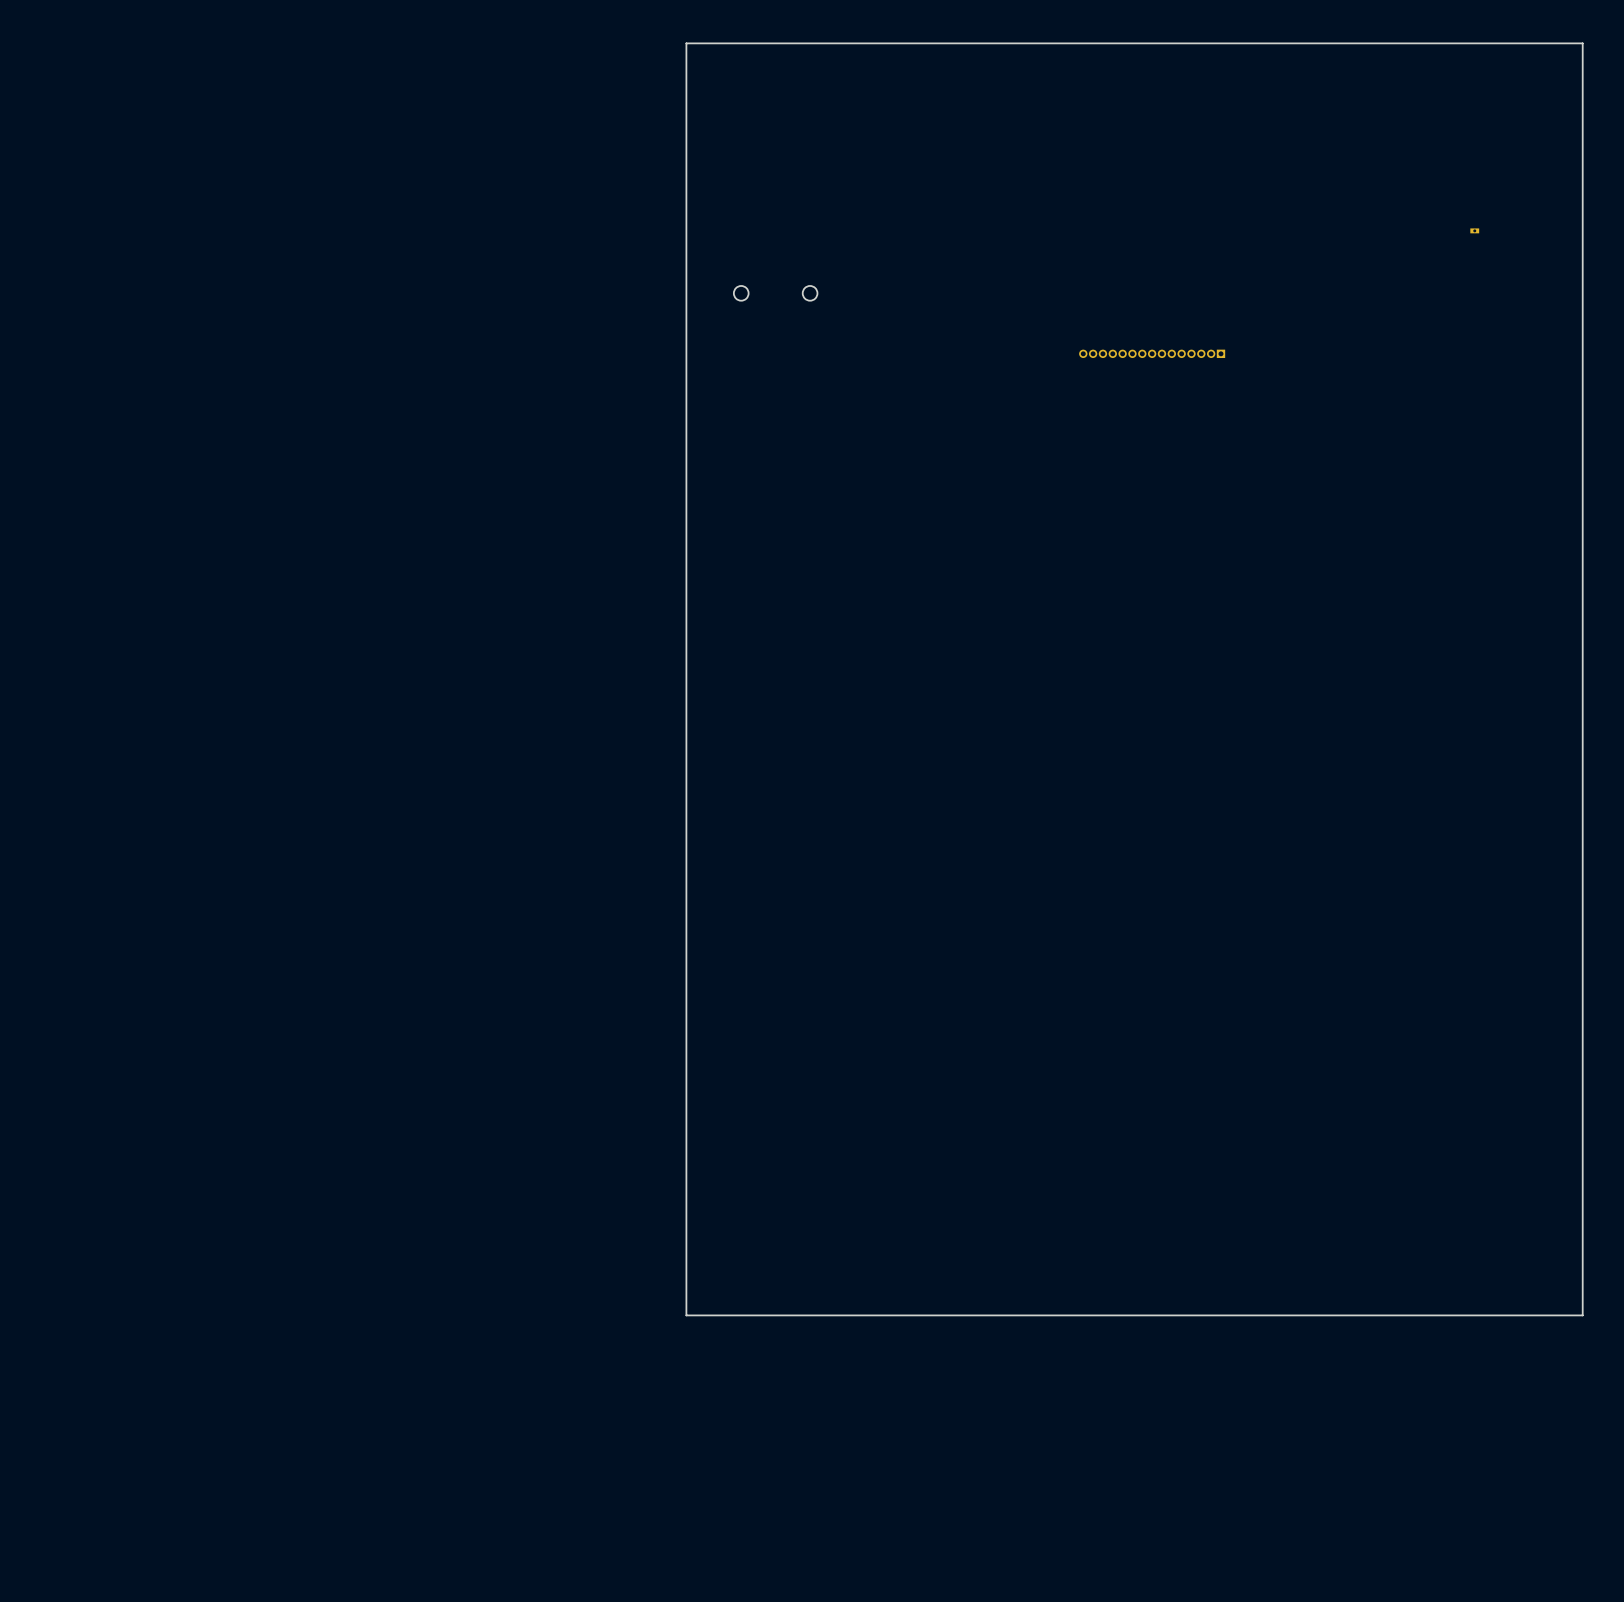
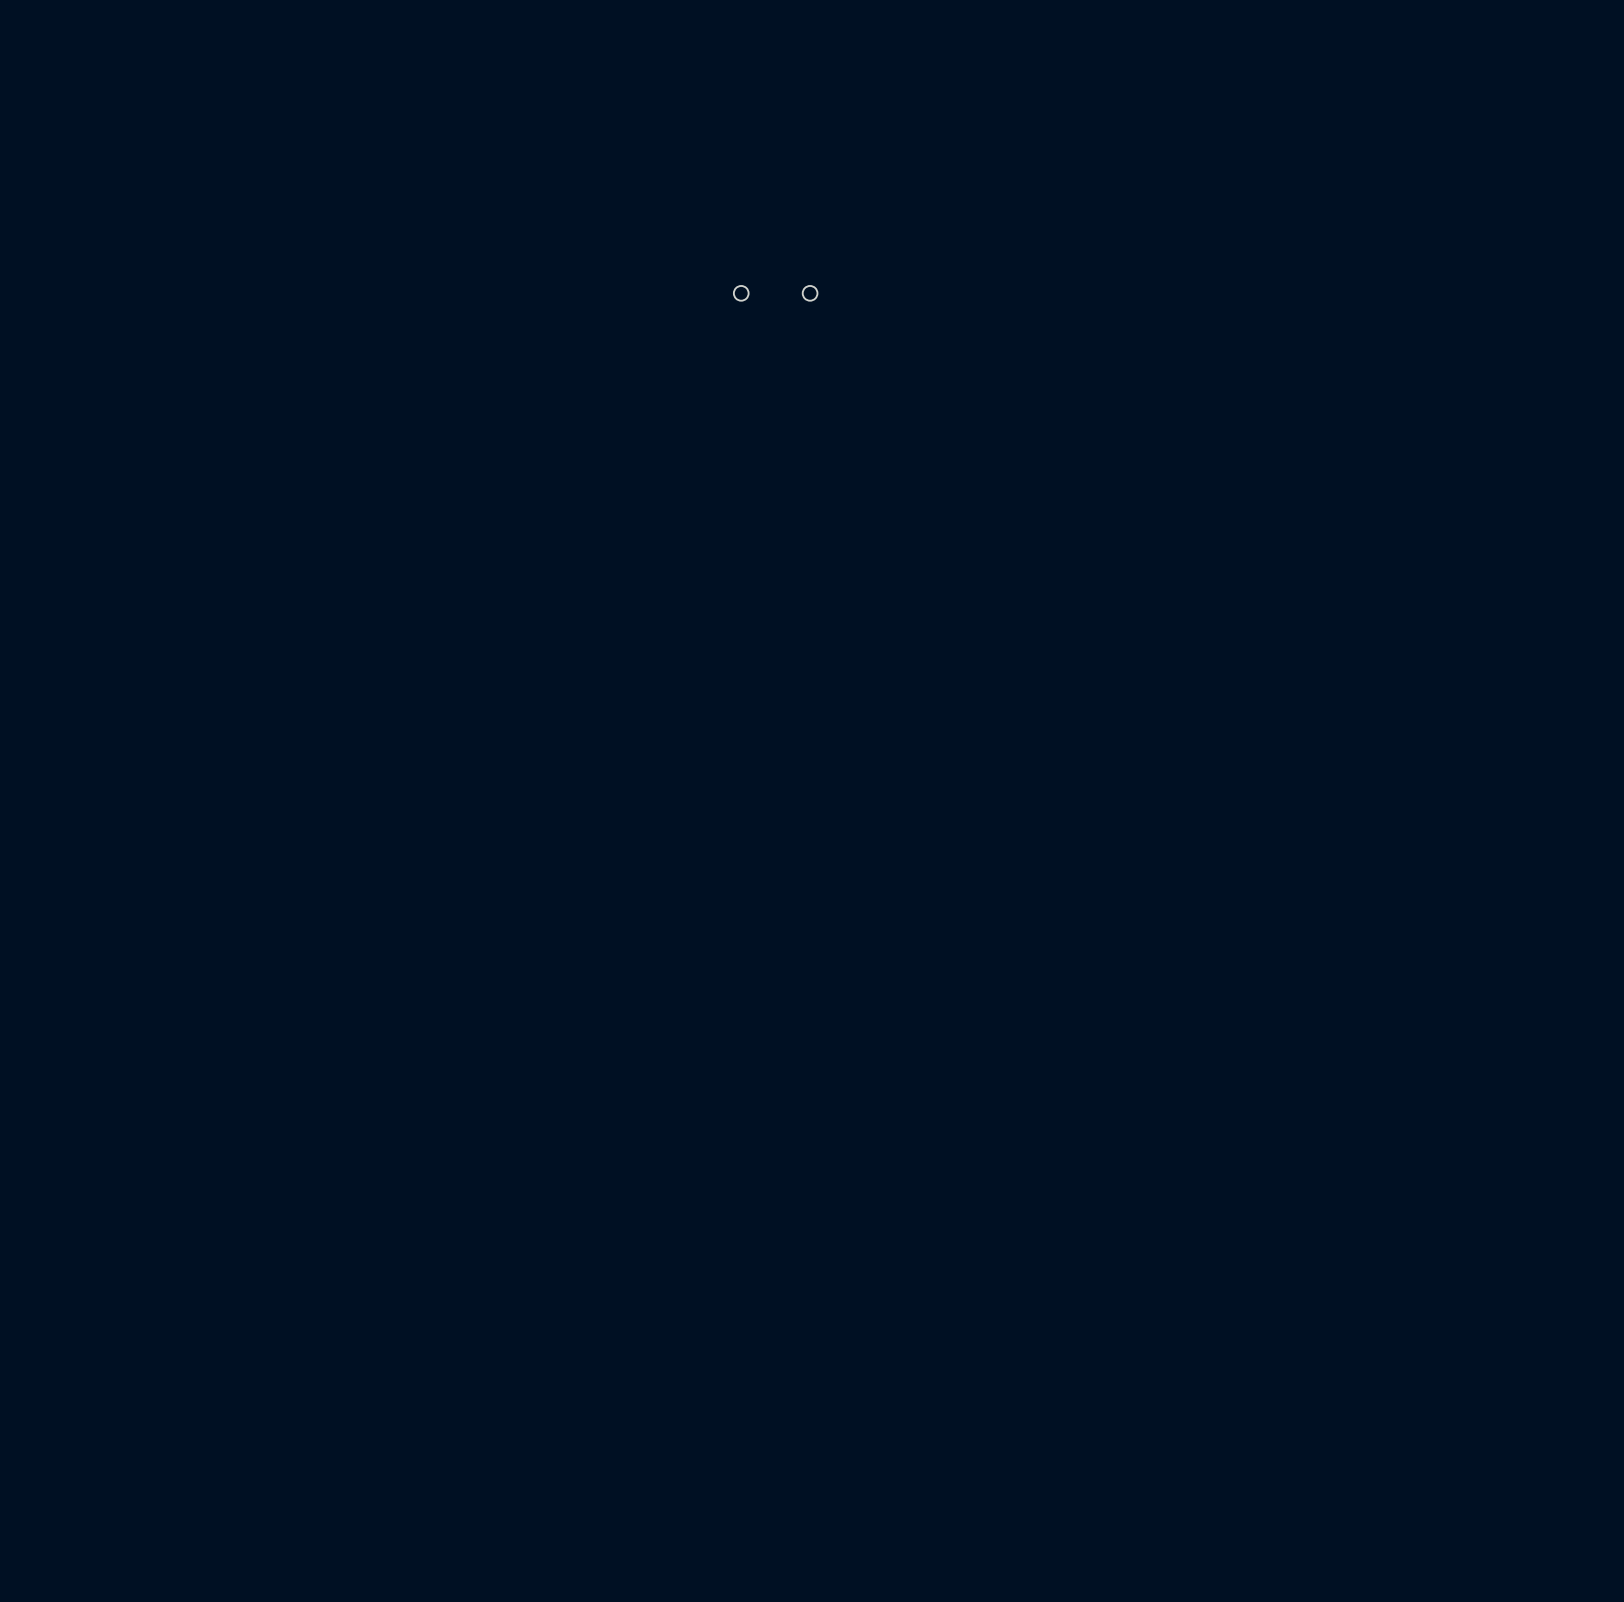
board edge: (1582, 43) (686, 43) (686, 1315) (1582, 1315) (1582, 43) -> none
part: (1474, 230) -> none
part: (1152, 353) -> none

